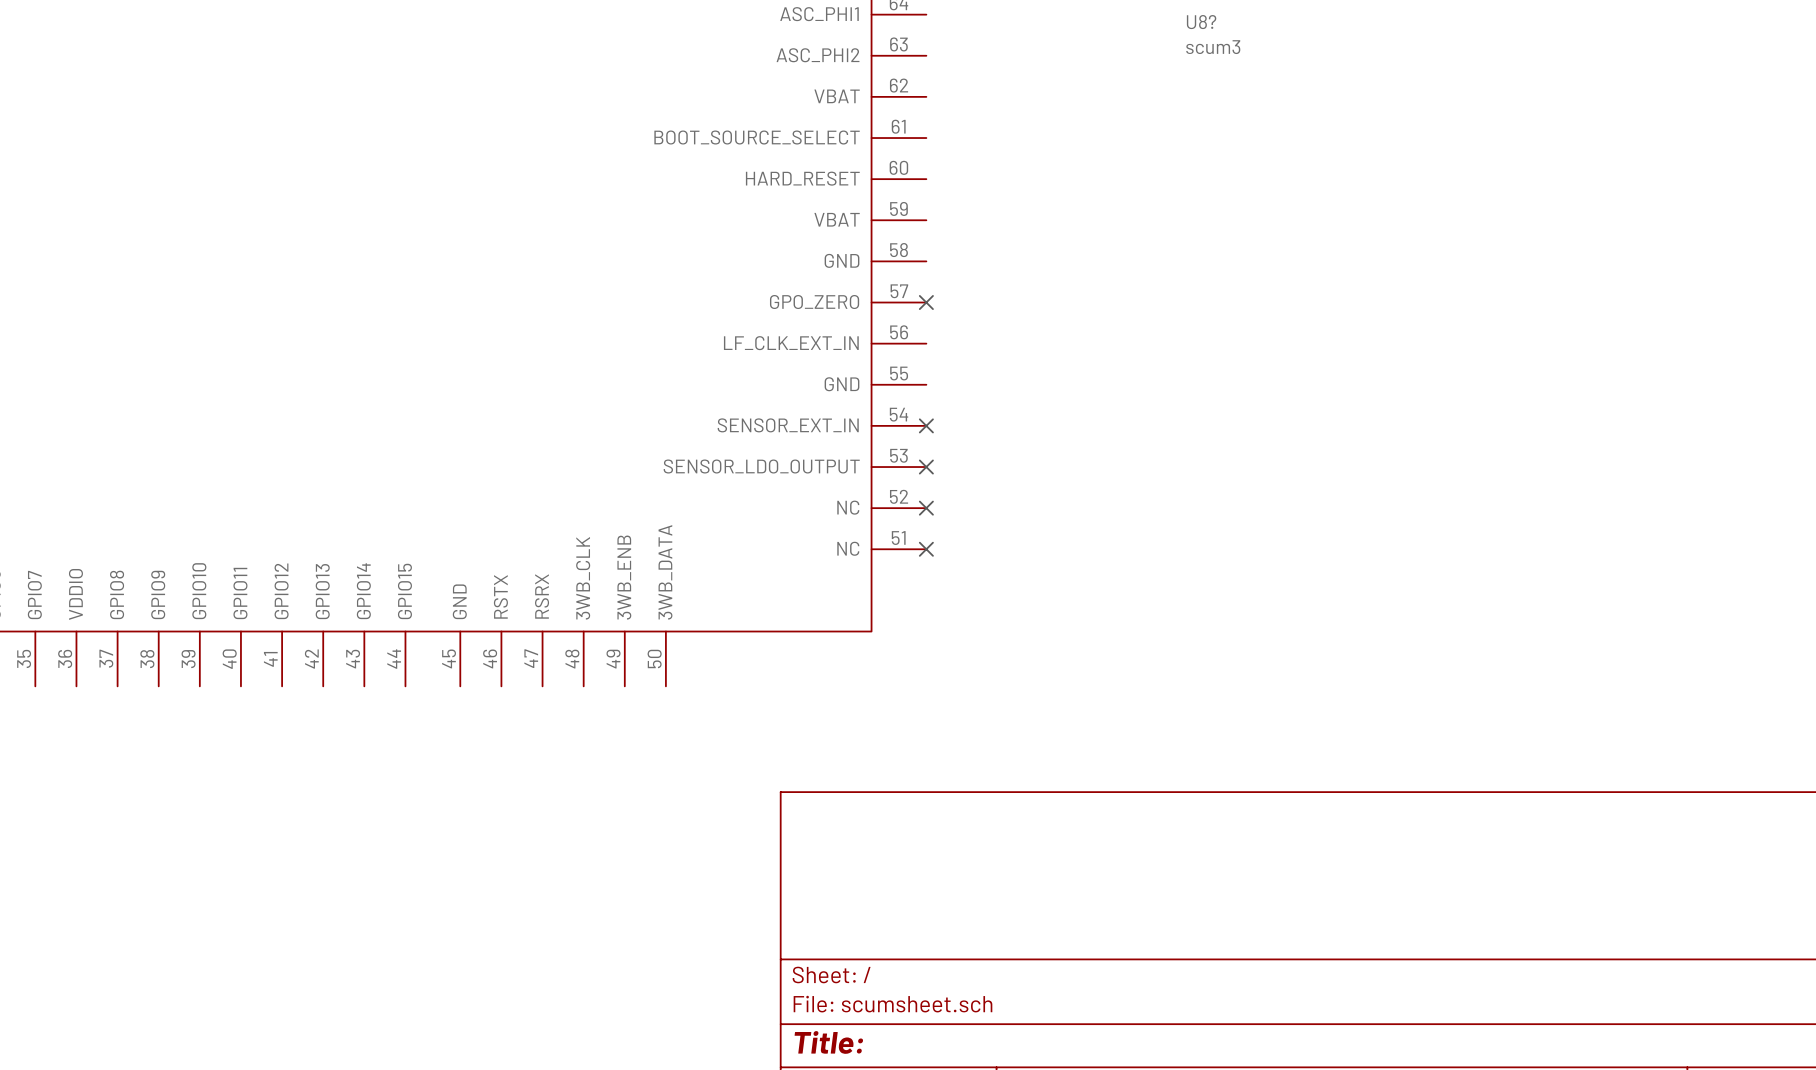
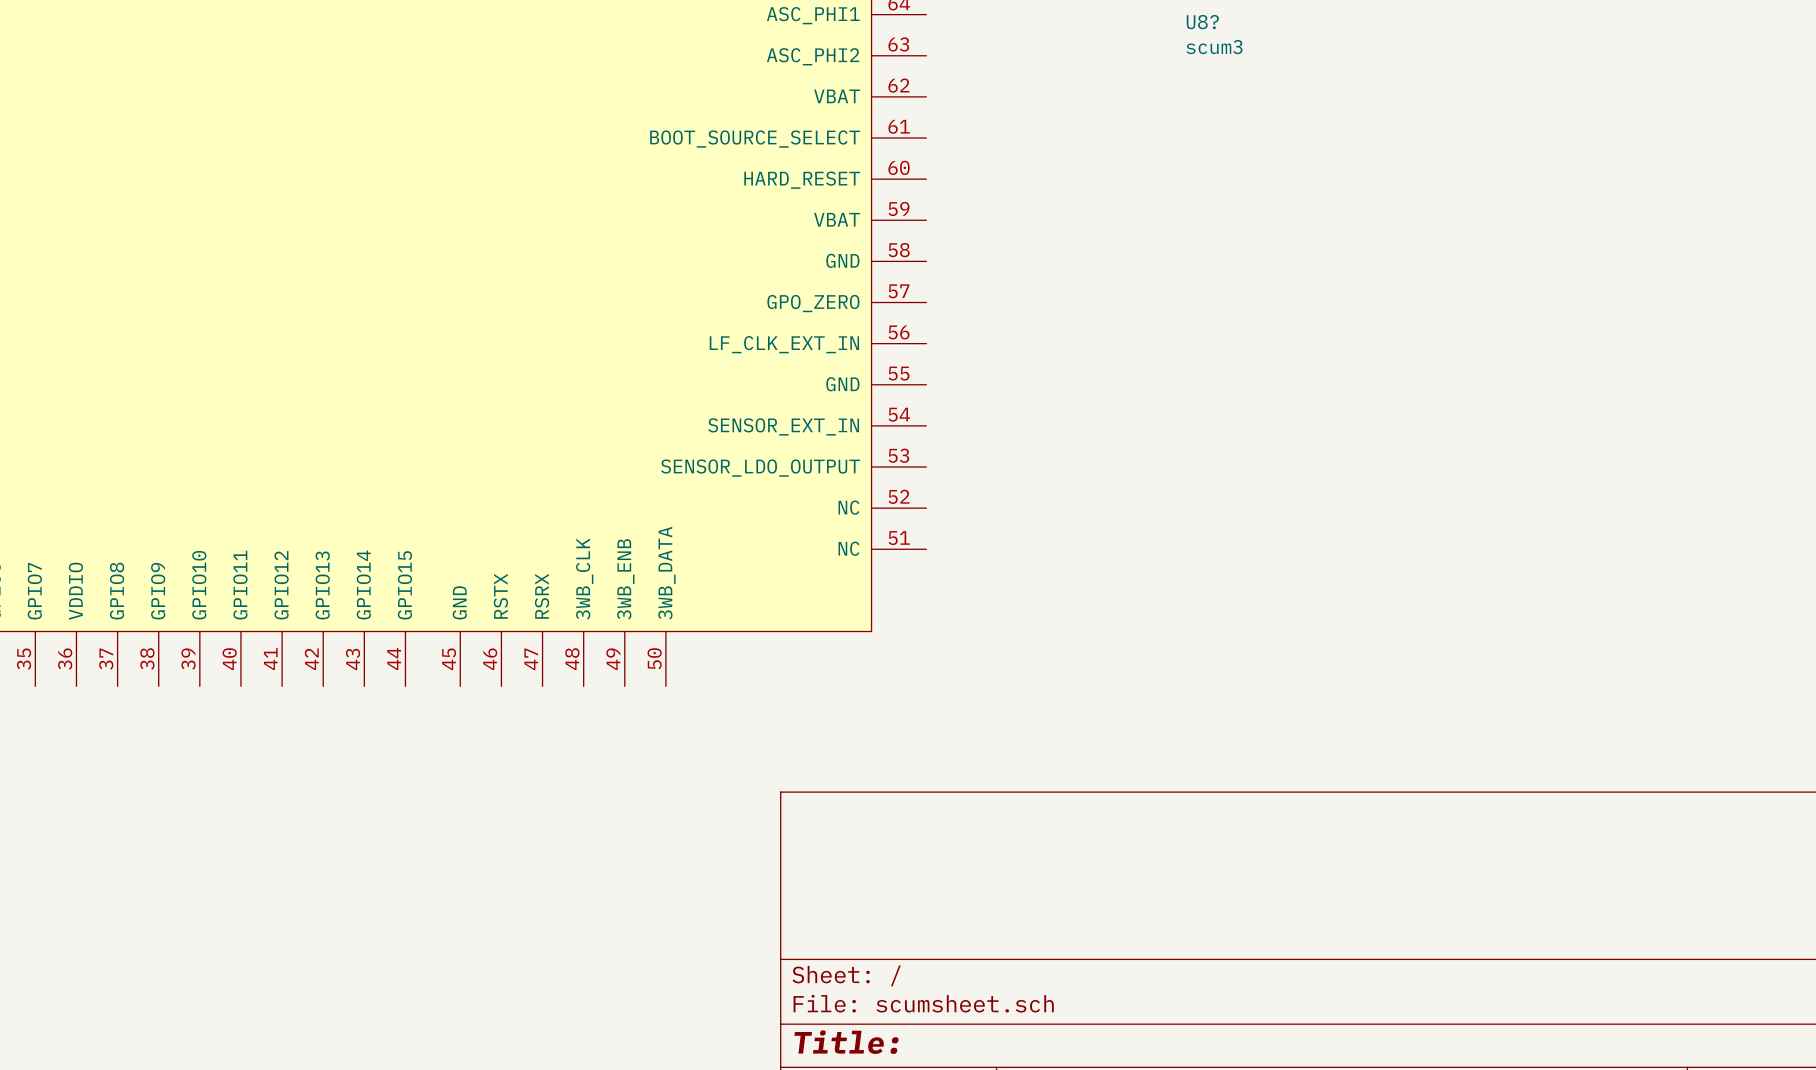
no-connect mark: (926, 302) -> none
no-connect mark: (926, 425) -> none
no-connect mark: (926, 467) -> none
no-connect mark: (926, 508) -> none
no-connect mark: (926, 549) -> none

